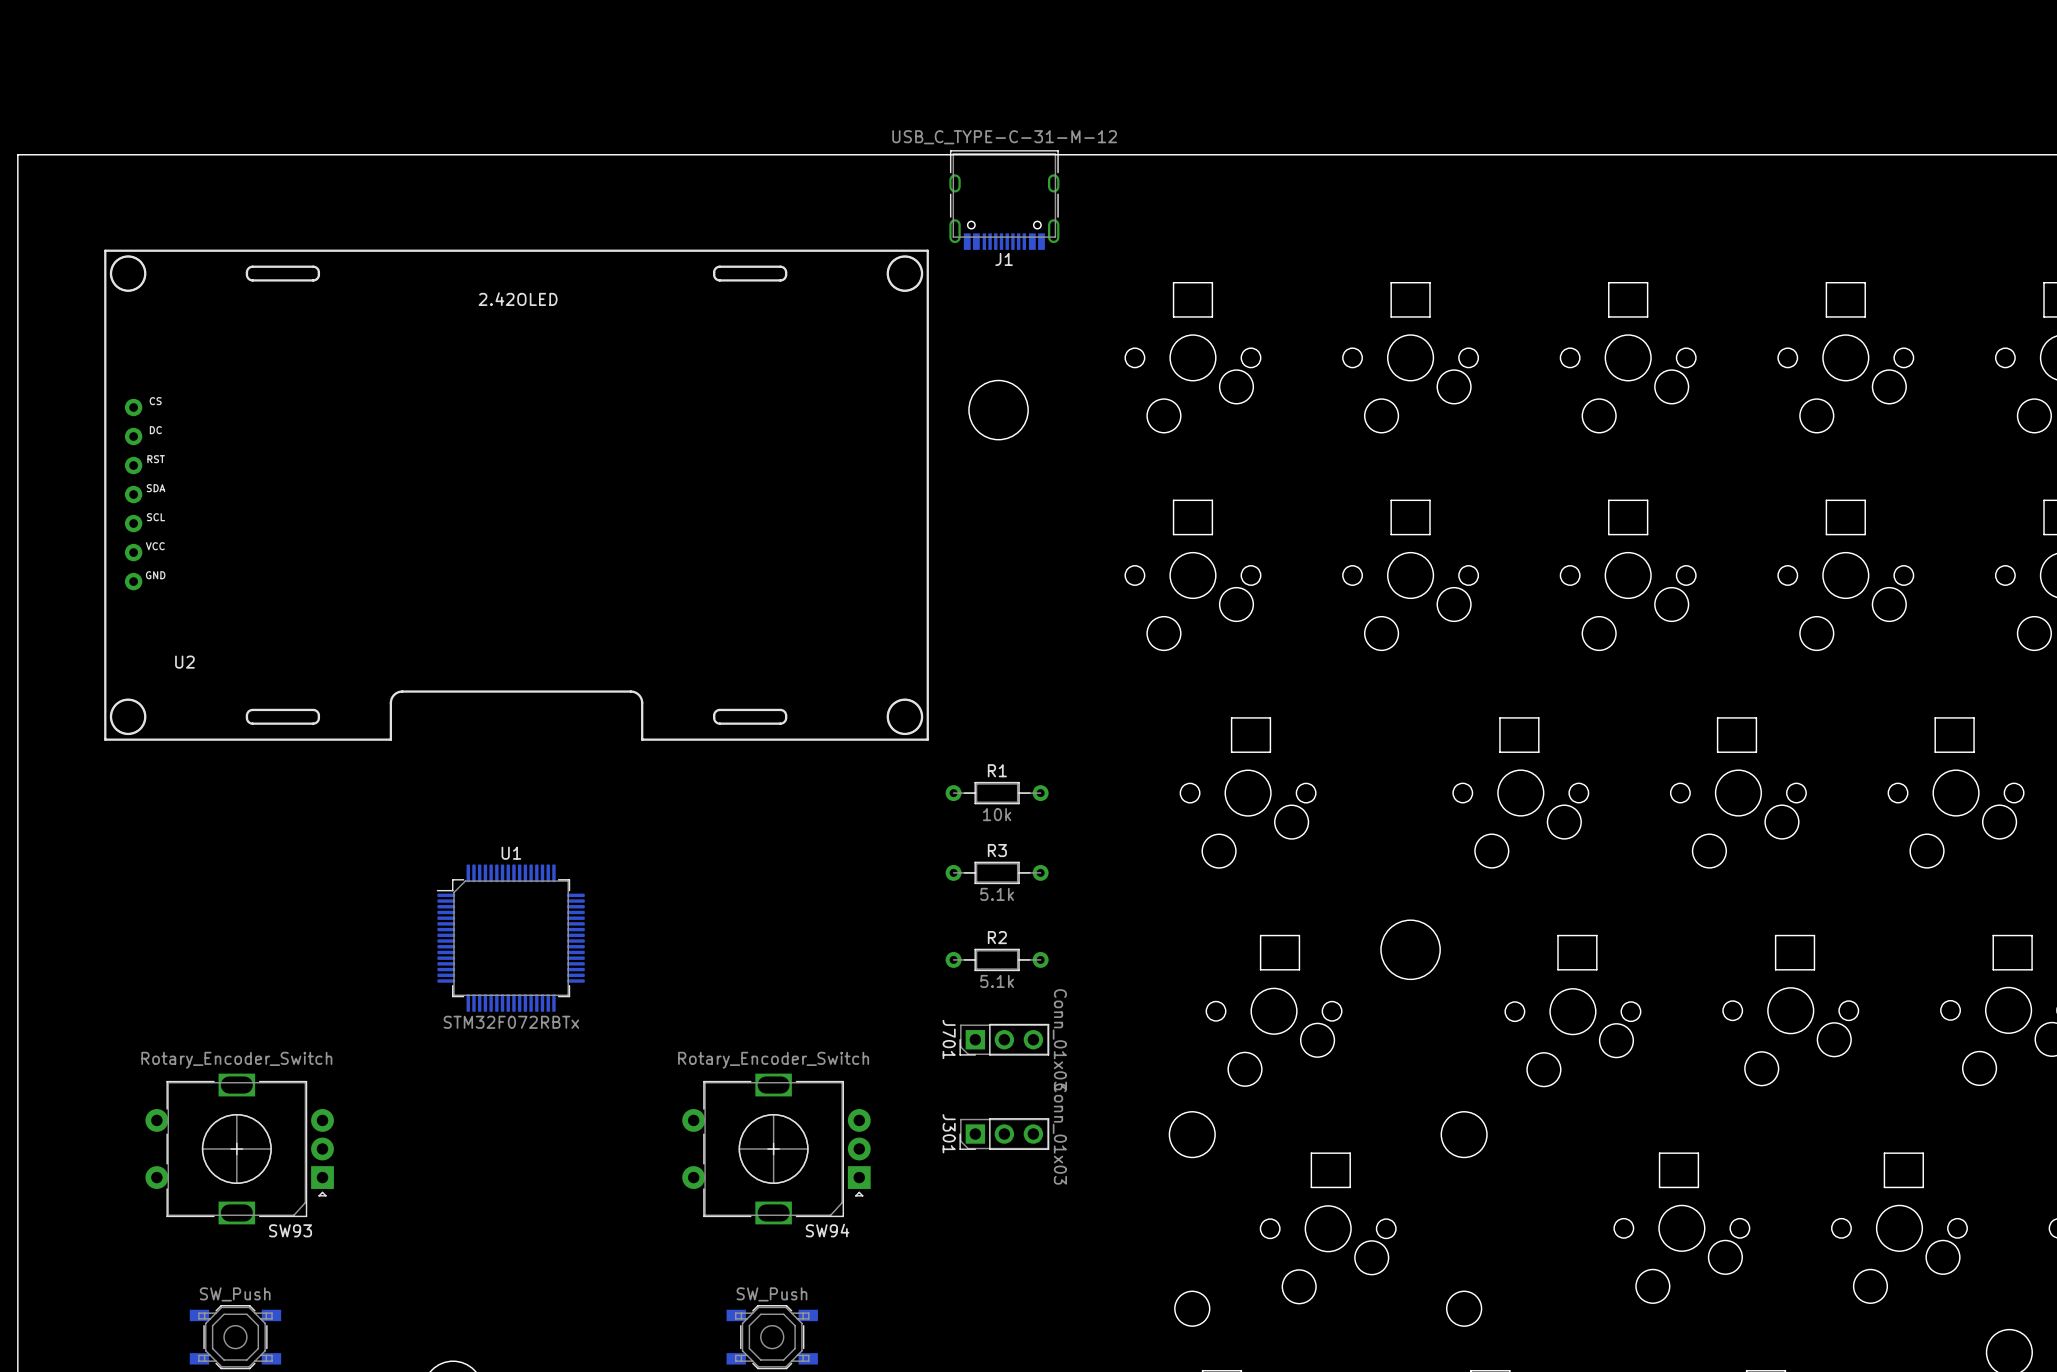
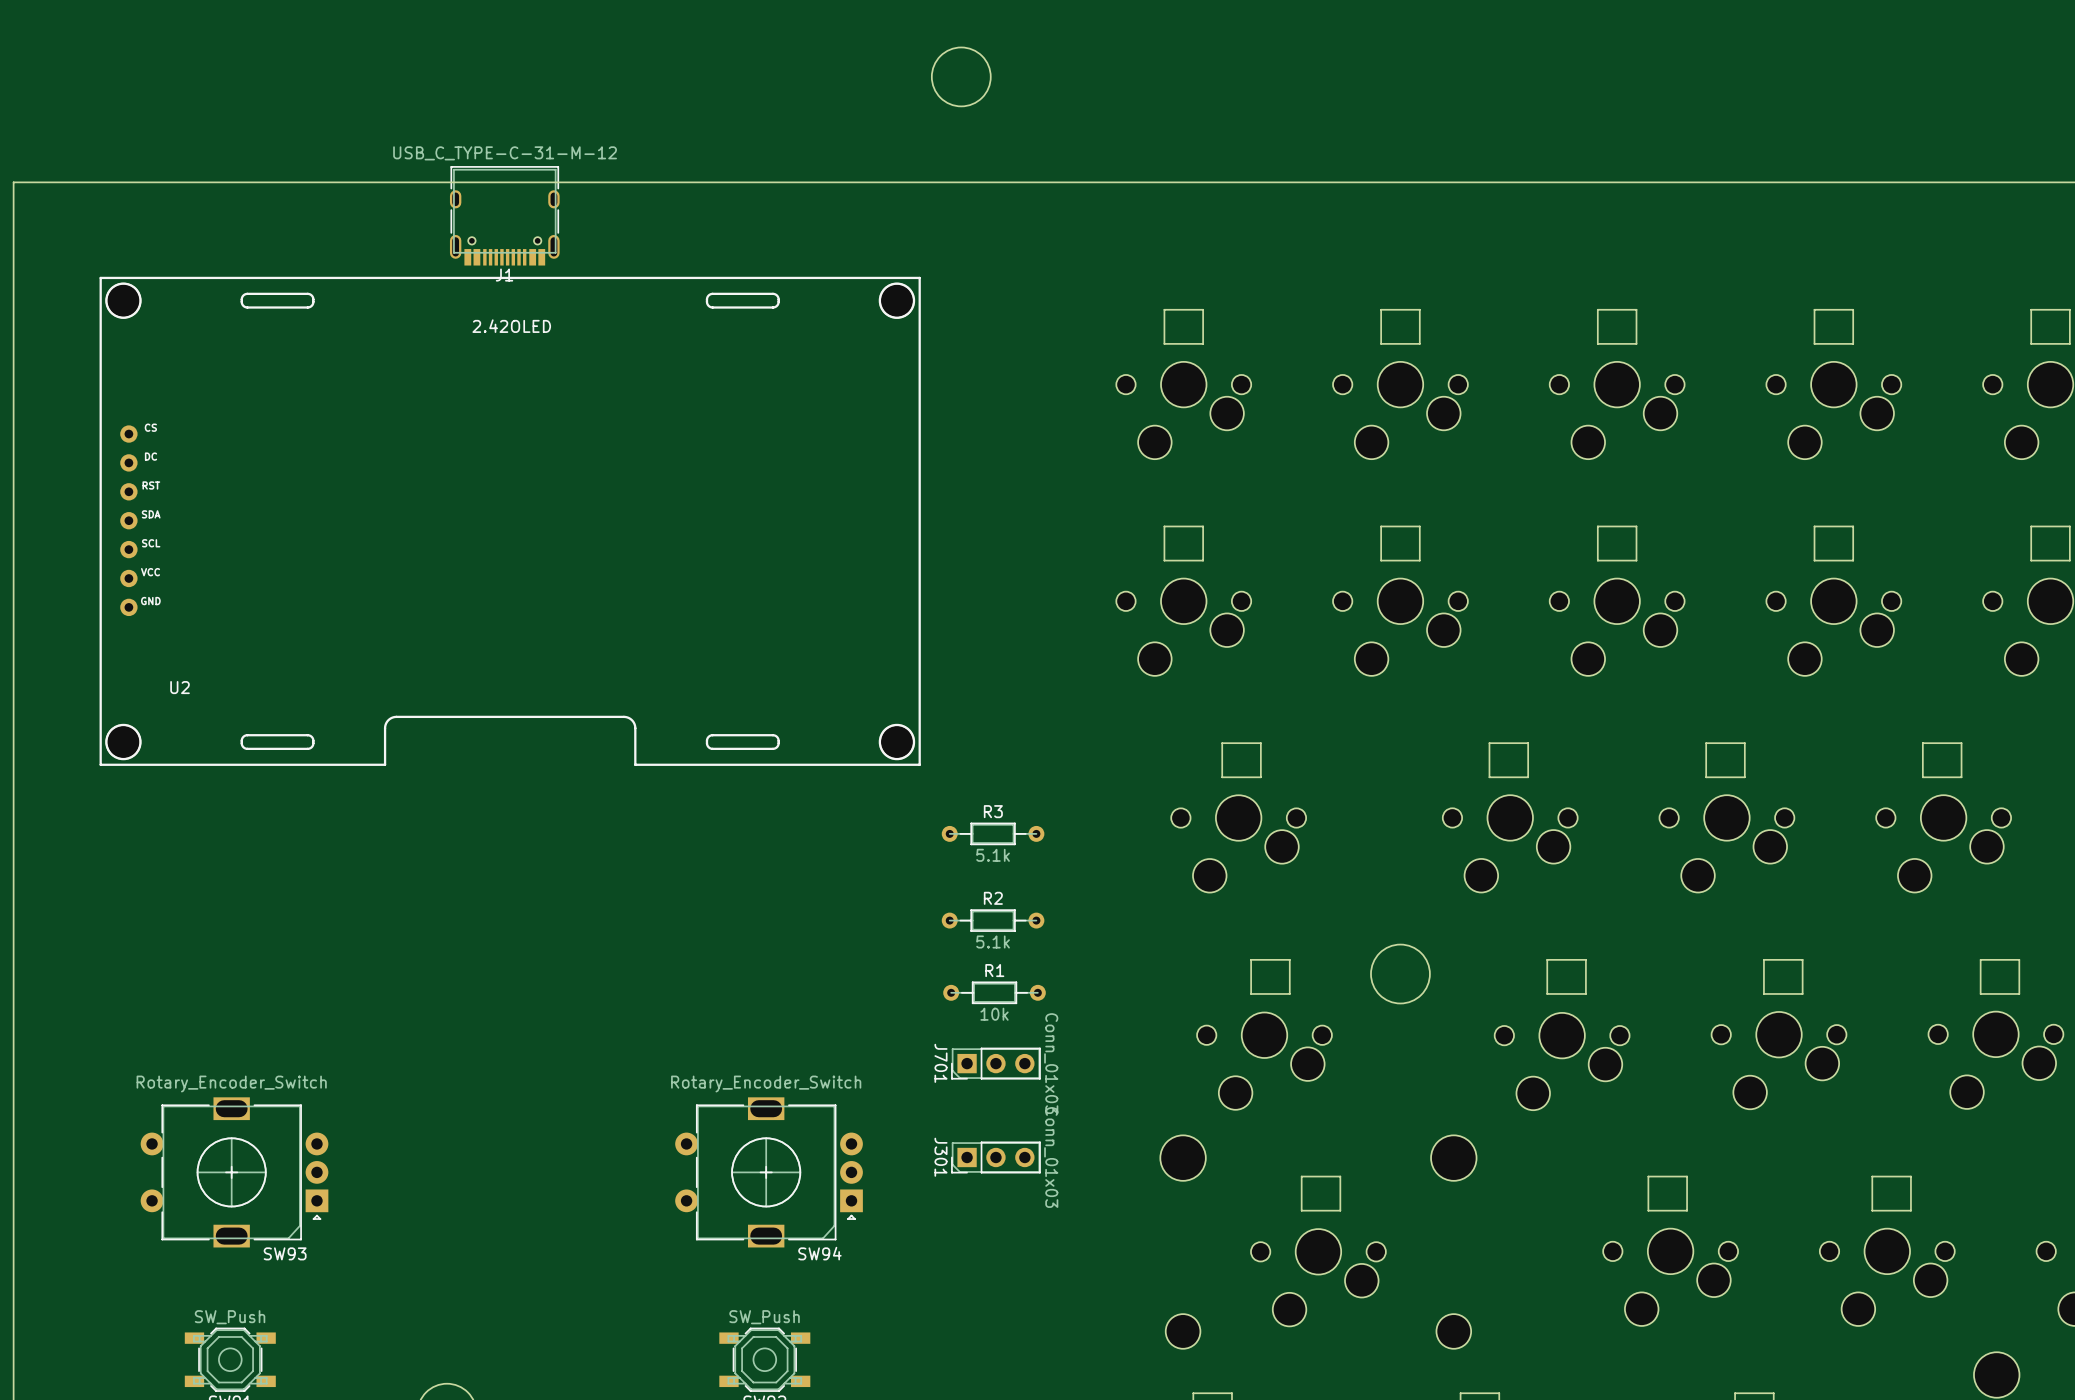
round board edge: none -> [931, 47, 992, 107]
J1 position: (1004, 200) -> (504, 215)
round board edge: [968, 380, 1029, 440] -> none
R1 position: (997, 793) -> (994, 992)
R3 position: (997, 872) -> (993, 833)
U1: STM32F072RBTx (510, 938) -> none
R2 position: (997, 959) -> (993, 920)

